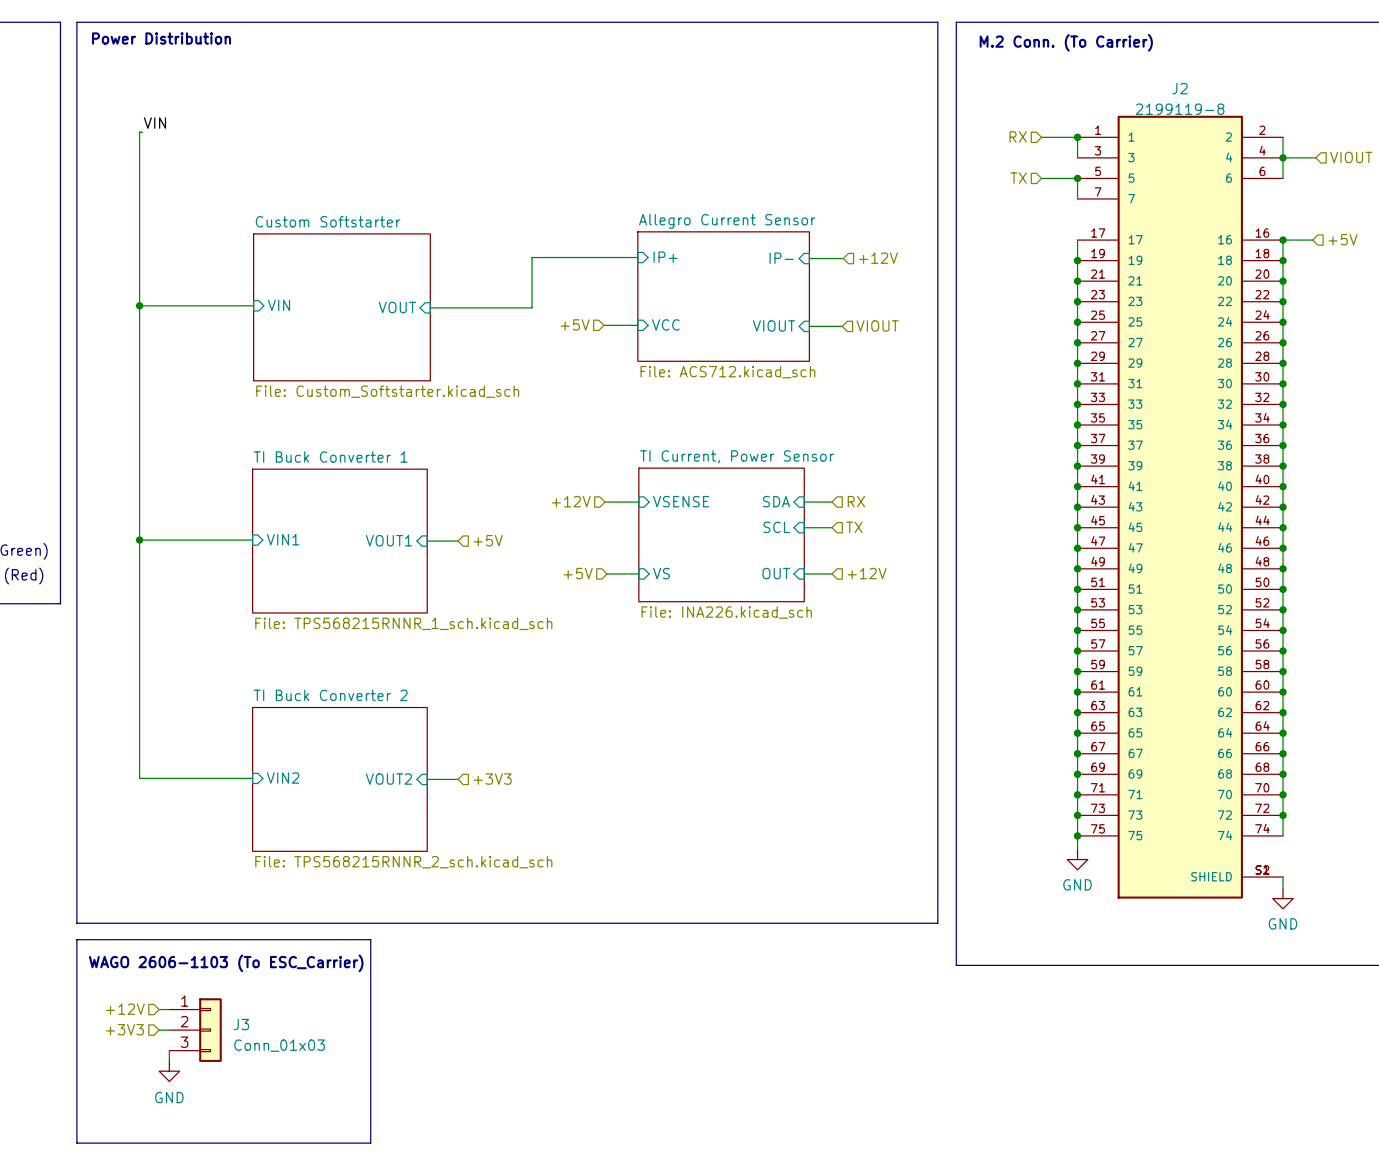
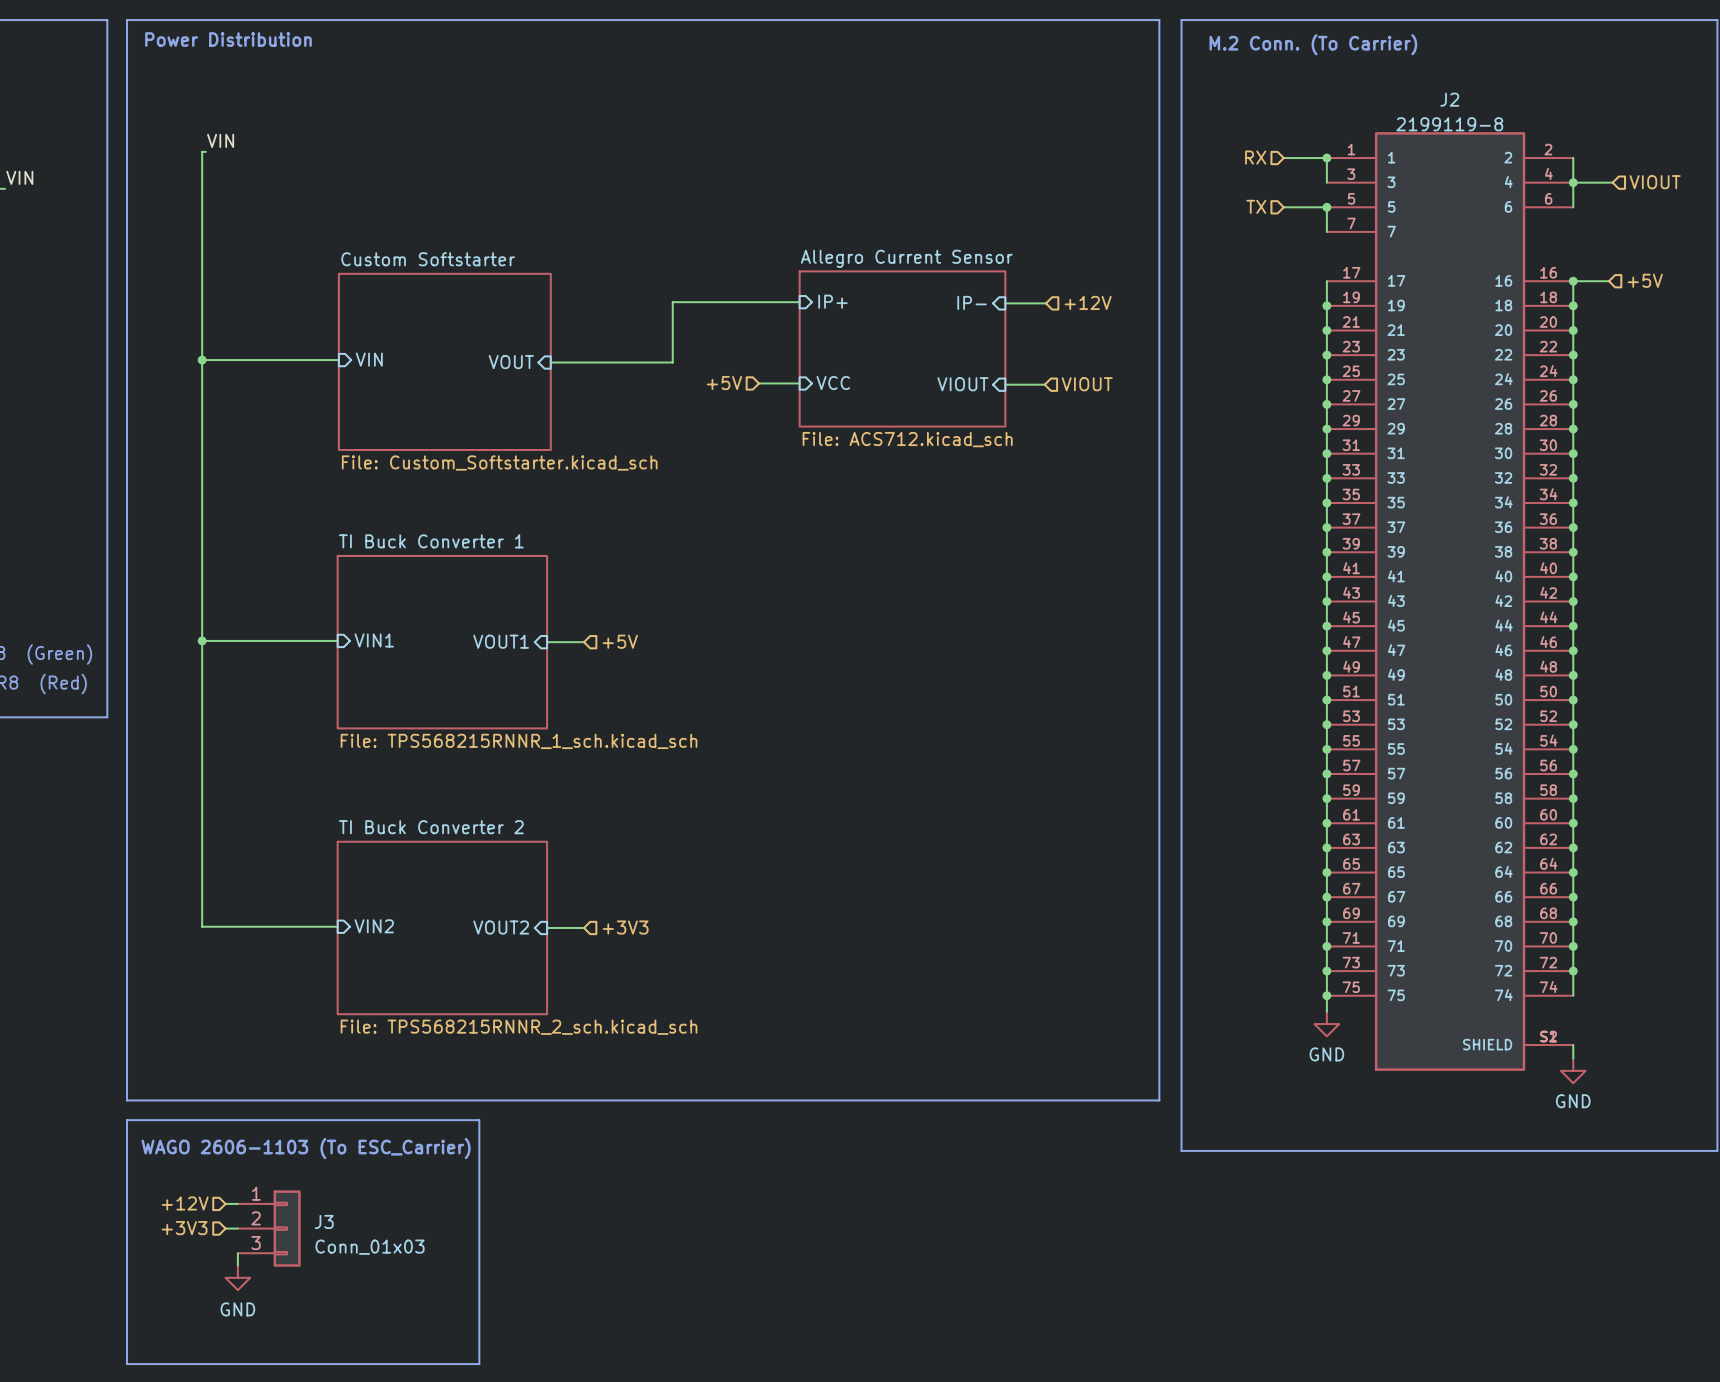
hierarchical label: +12V (571, 501) -> none
sheet pin: VSENSE (681, 501) -> none
sheet pin: SDA (776, 501) -> none
hierarchical label: RX (856, 501) -> none
wire: (604, 502) (638, 502) -> none
wire: (804, 502) (832, 502) -> none
sheet pin: SCL (776, 527) -> none
wire: (804, 527) (832, 527) -> none
hierarchical label: TX (854, 527) -> none
sheet TI Current, Power Sensor: File: INA226.kicad_sch (721, 534) -> none
hierarchical label: +5V (578, 573) -> none
wire: (607, 573) (638, 573) -> none
sheet pin: VS (661, 573) -> none
sheet pin: OUT (776, 573) -> none
wire: (804, 573) (832, 573) -> none
hierarchical label: +12V (867, 573) -> none

